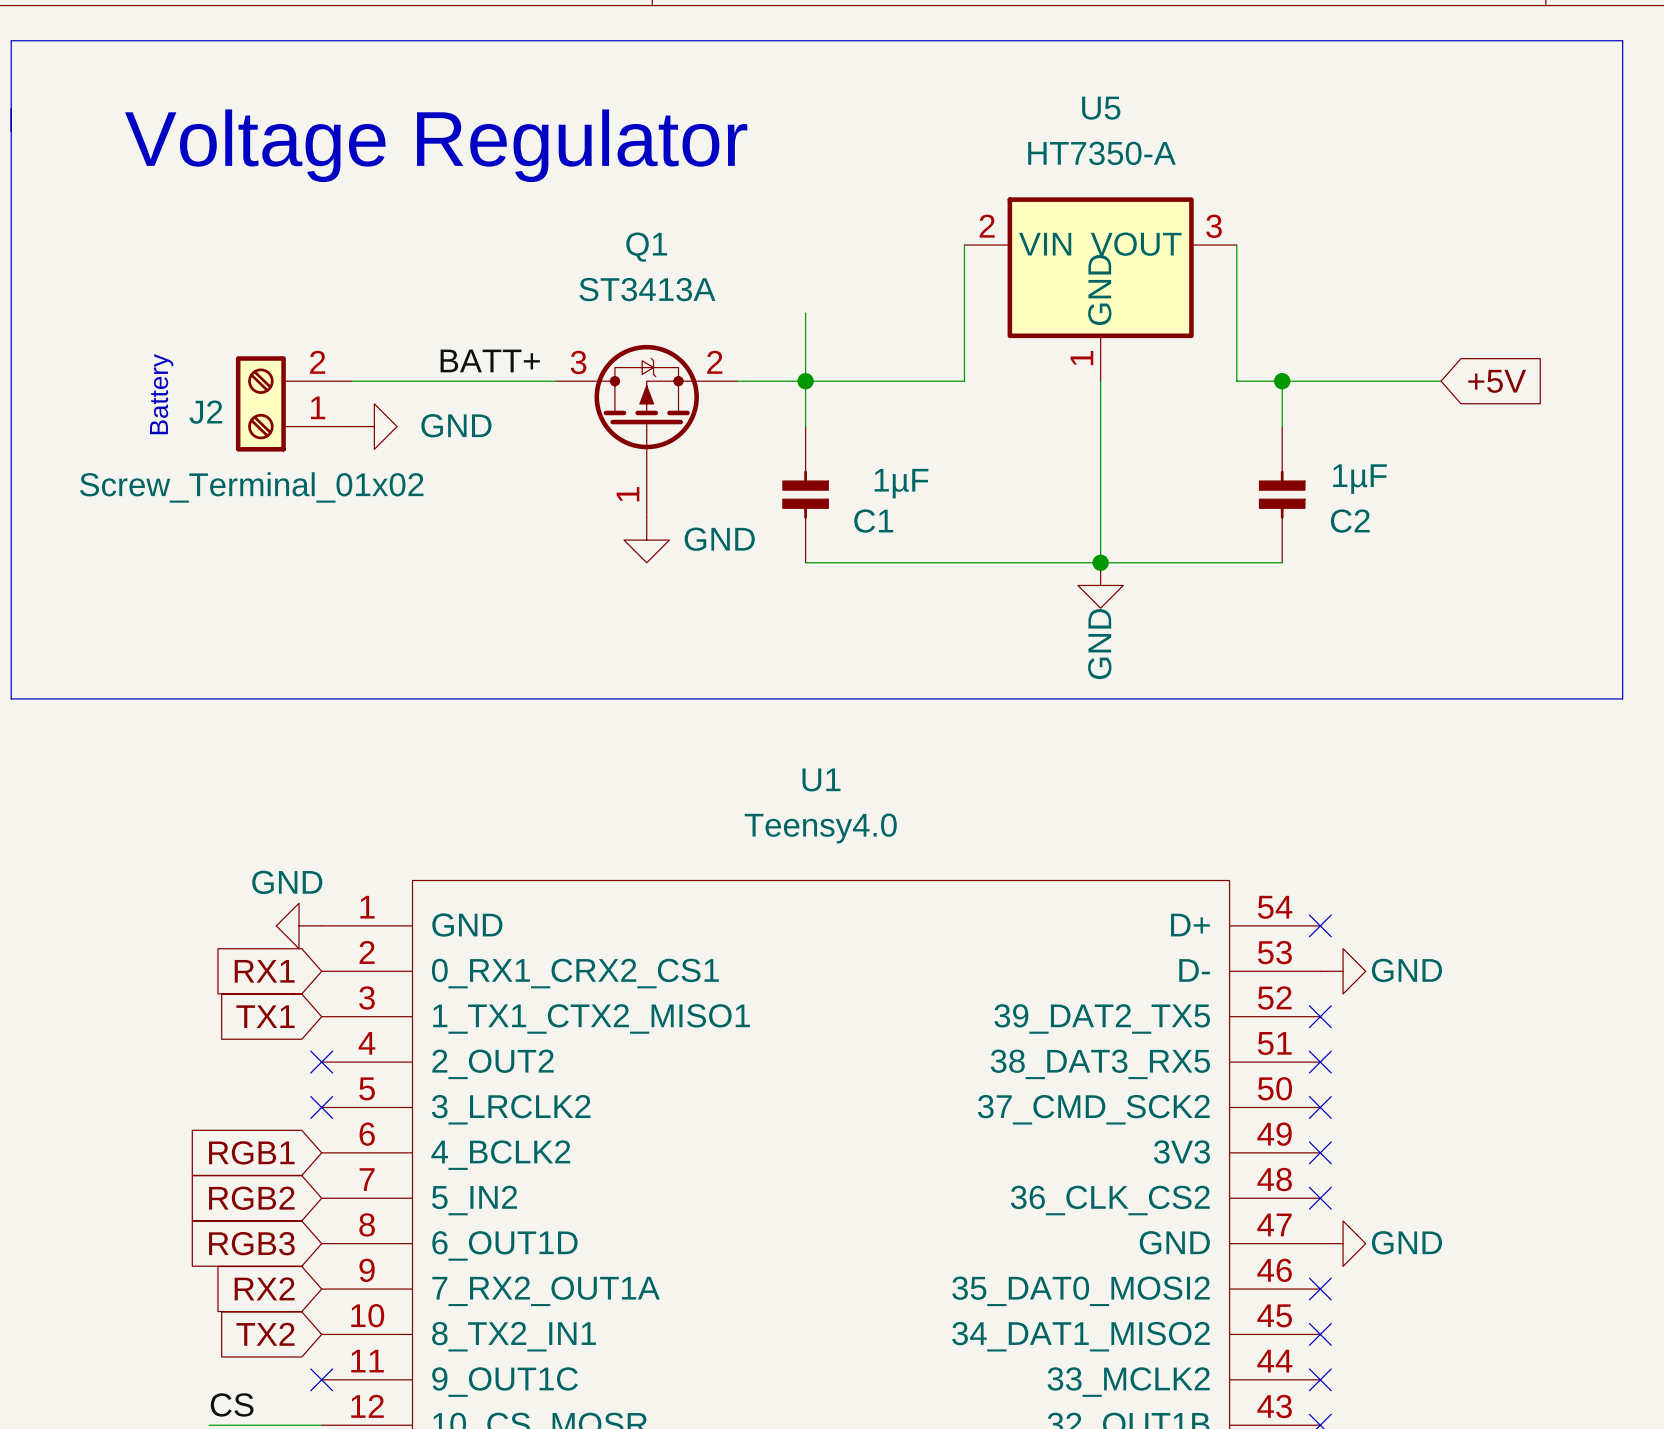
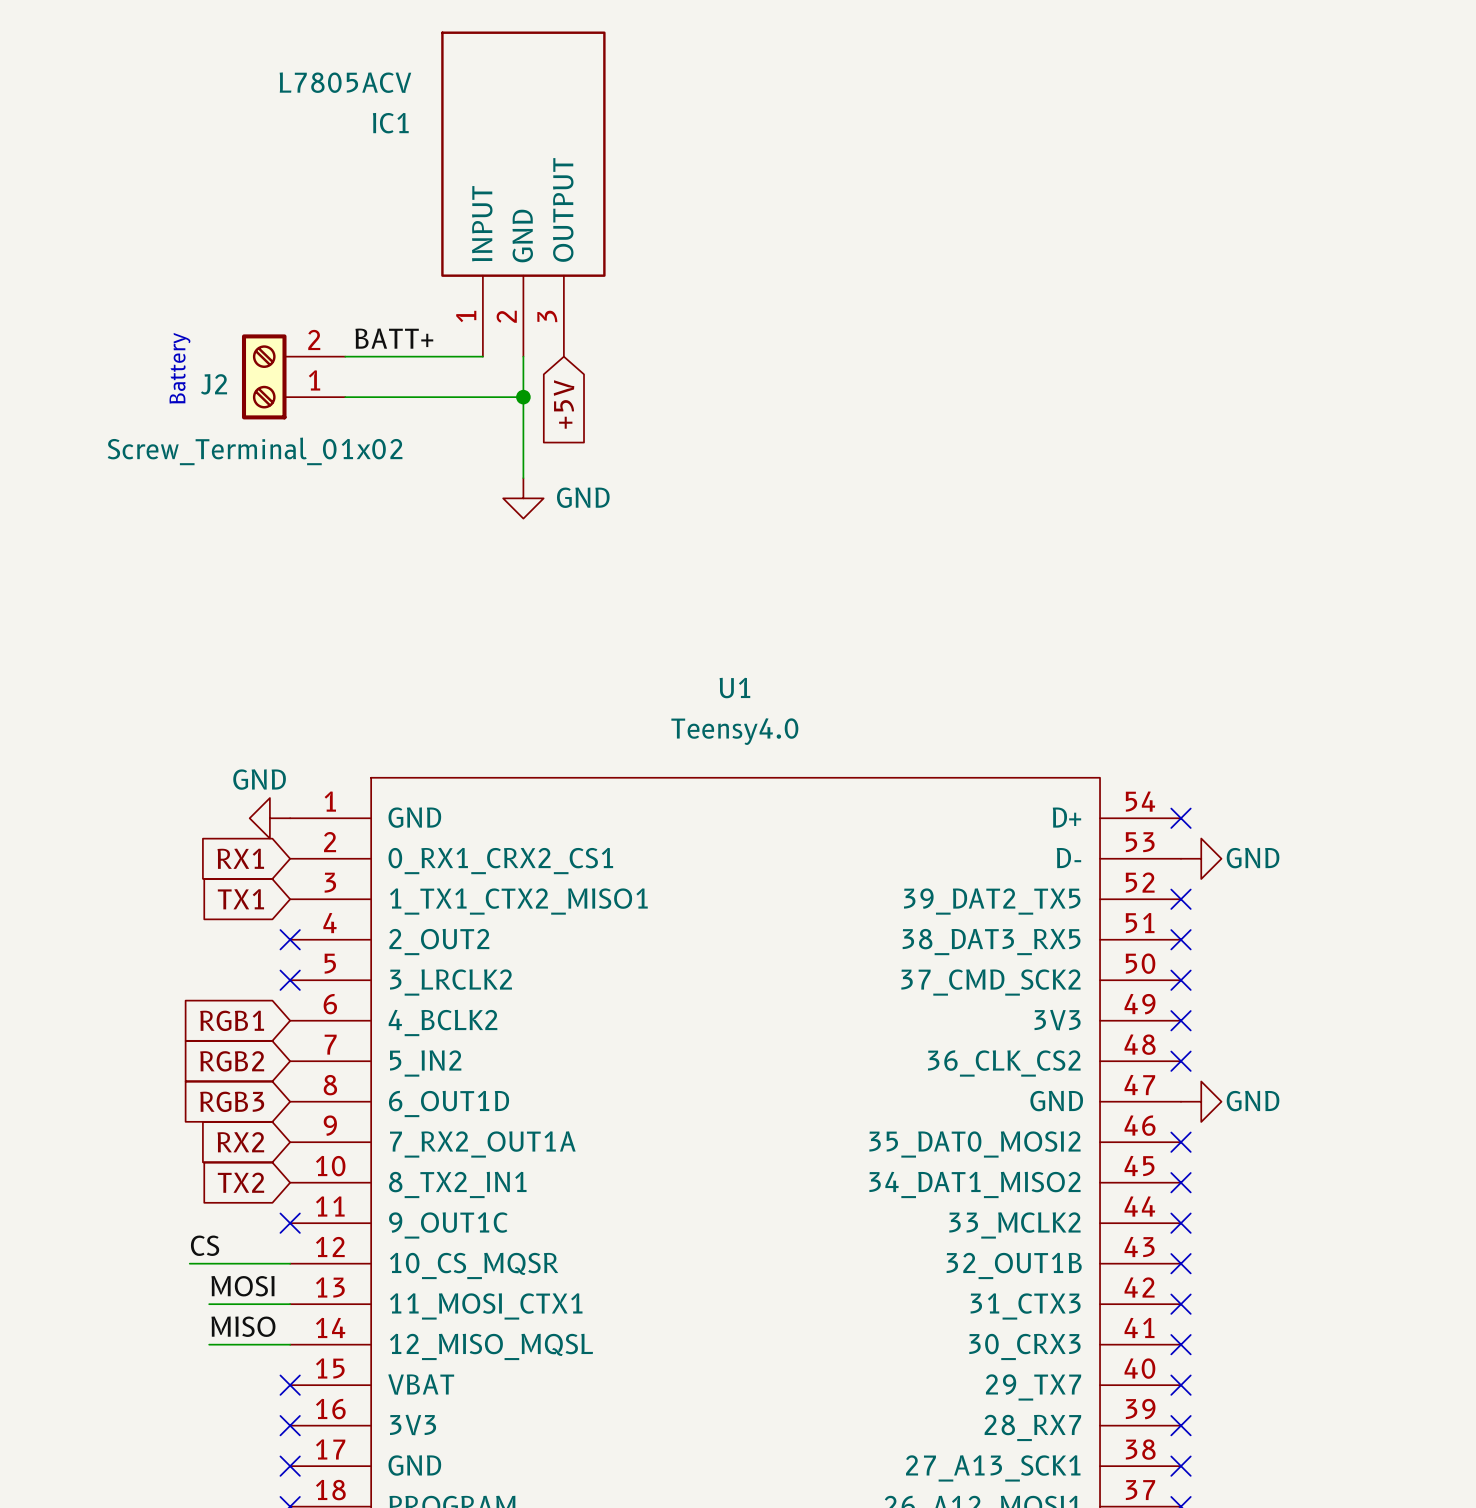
line: (11, 40) (1622, 40) (1622, 698) (11, 698) (11, 40) -> none
text: Voltage Regulator (436, 145) -> none
IC1: none -> L7805ACV (523, 194)
wire: (964, 245) (964, 381) (737, 381) -> none
wire: (1236, 245) (1236, 381) (1441, 381) -> none
U5: HT7350-A (1100, 289) -> none
wire: (805, 313) (805, 426) -> none
label position: BATT+ (490, 360) -> BATT+ (394, 338)
wire: (351, 381) (555, 381) -> none
junction: (805, 381) -> none
wire: (1100, 381) (1100, 562) -> none
wire: (1282, 381) (1282, 426) -> none
junction: (1282, 381) -> none
global label: +5V (1497, 381) -> none
text position: Battery (161, 394) -> Battery (179, 368)
J2 position: (293, 403) -> (293, 376)
wire: none -> (345, 356) (482, 356)
wire: none -> (523, 356) (523, 478)
power symbol: GND (374, 426) -> none
Q1: ST3413A (646, 431) -> none
wire: none -> (345, 397) (523, 397)
junction: none -> (523, 397)
global label: none -> +5V (564, 404)
C1: 1µF (805, 494) -> none
C2: 1µF (1282, 494) -> none
power symbol position: GND (646, 540) -> GND (523, 498)
wire: (805, 562) (1282, 562) -> none
junction: (1100, 562) -> none
power symbol: GND (1100, 585) -> none

